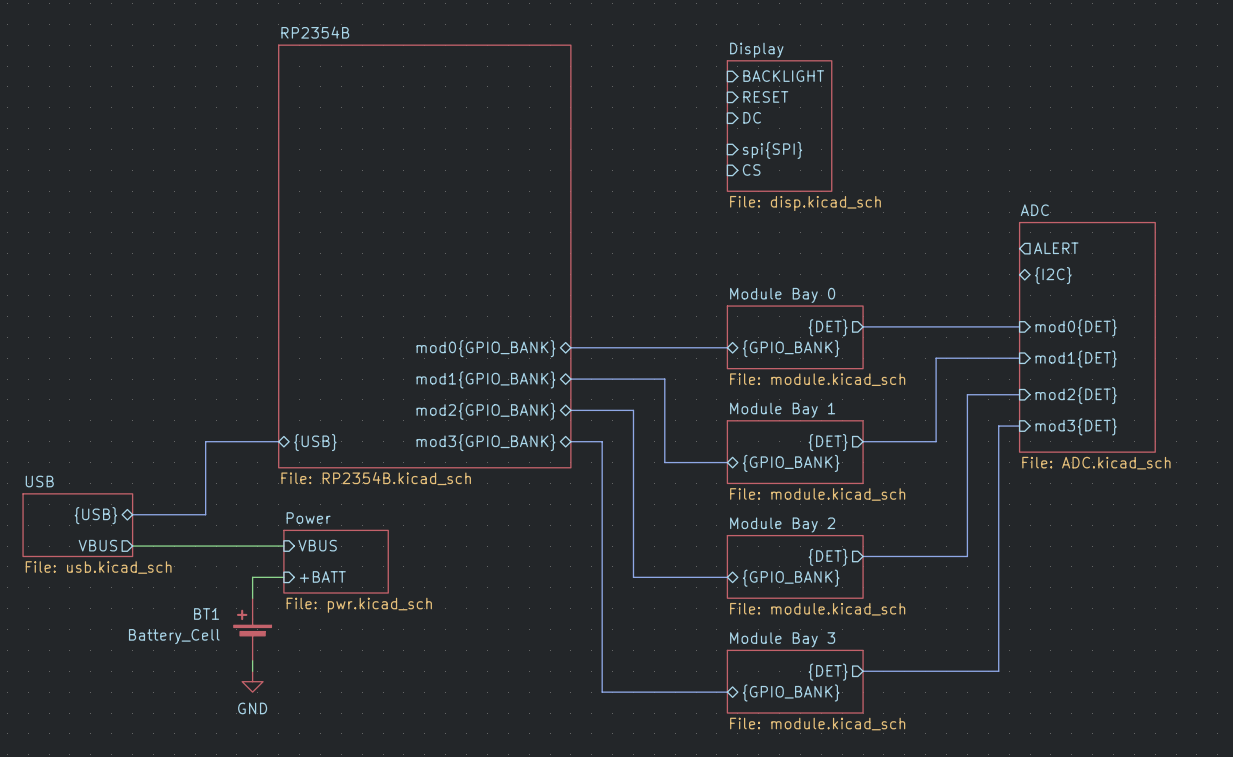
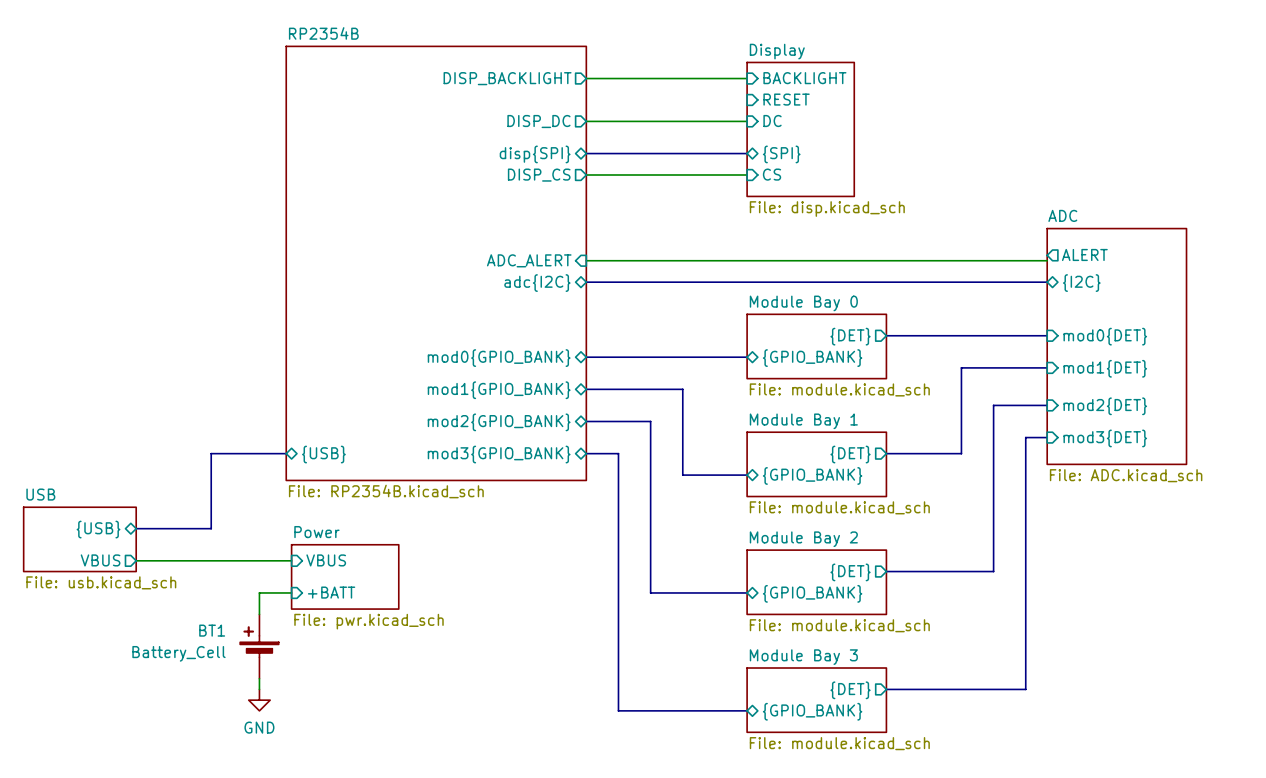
sheet pin: none -> DISP_BACKLIGHT (507, 78)
wire: none -> (586, 78) (747, 78)
sheet pin: none -> DISP_DC (538, 121)
wire: none -> (586, 121) (747, 121)
bus: none -> (586, 153) (747, 153)
sheet pin: none -> disp{SPI} (535, 154)
sheet pin shape: input (772, 150) -> bidirectional (781, 154)
sheet pin: spi{SPI} (772, 150) -> {SPI} (781, 154)
sheet pin: none -> DISP_CS (539, 175)
wire: none -> (586, 174) (747, 174)
sheet pin: none -> ADC_ALERT (529, 260)
wire: none -> (586, 260) (1047, 260)
bus: none -> (586, 282) (1047, 282)
sheet pin: none -> adc{I2C} (537, 283)

